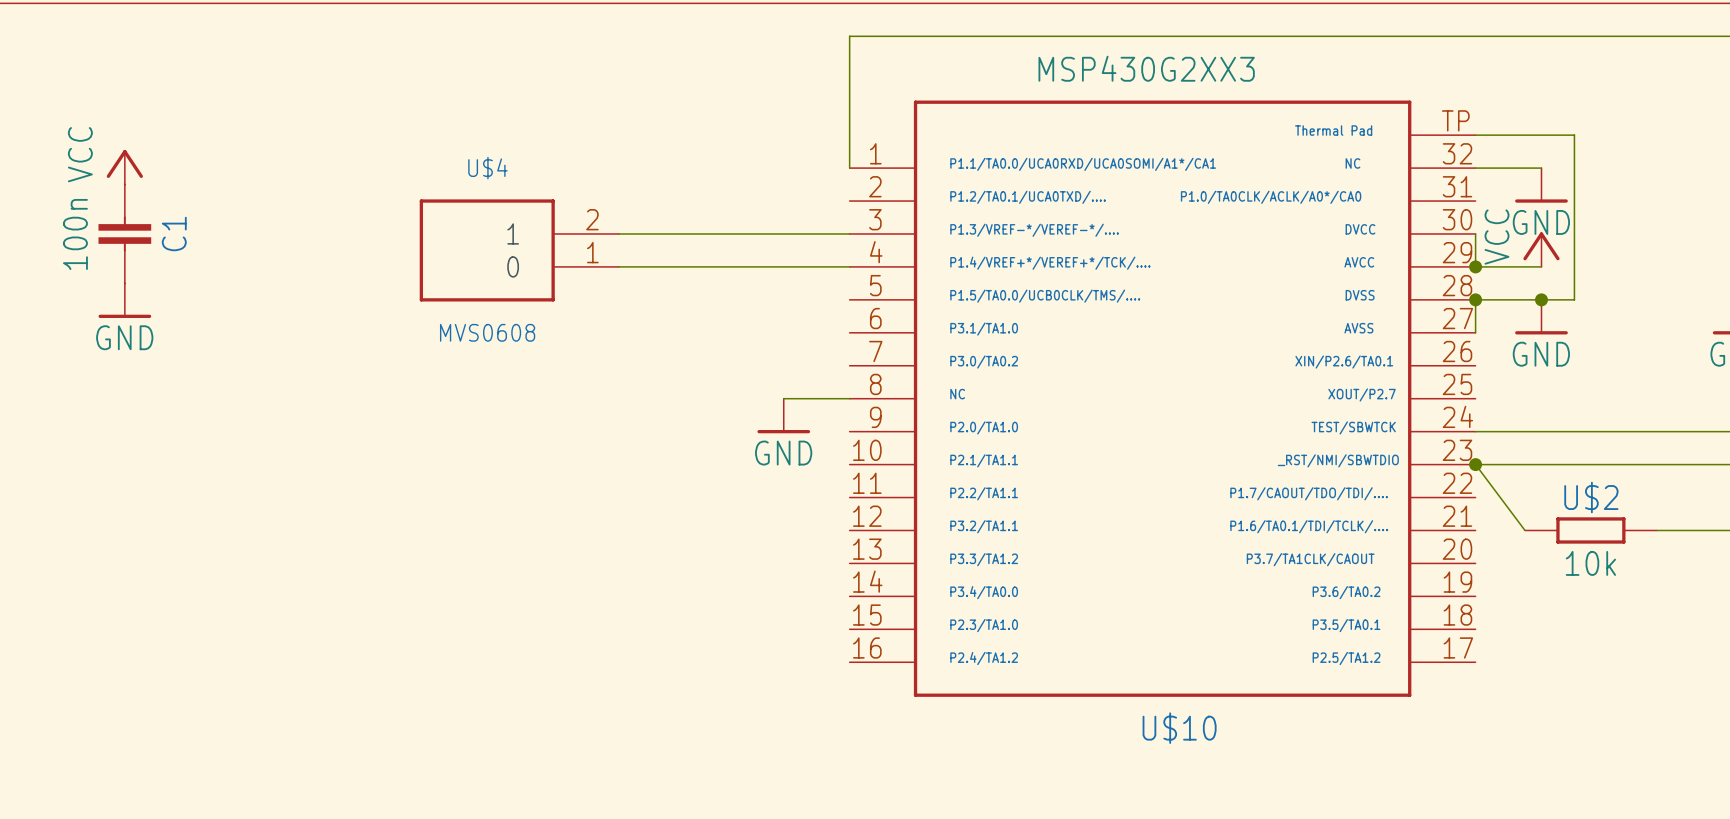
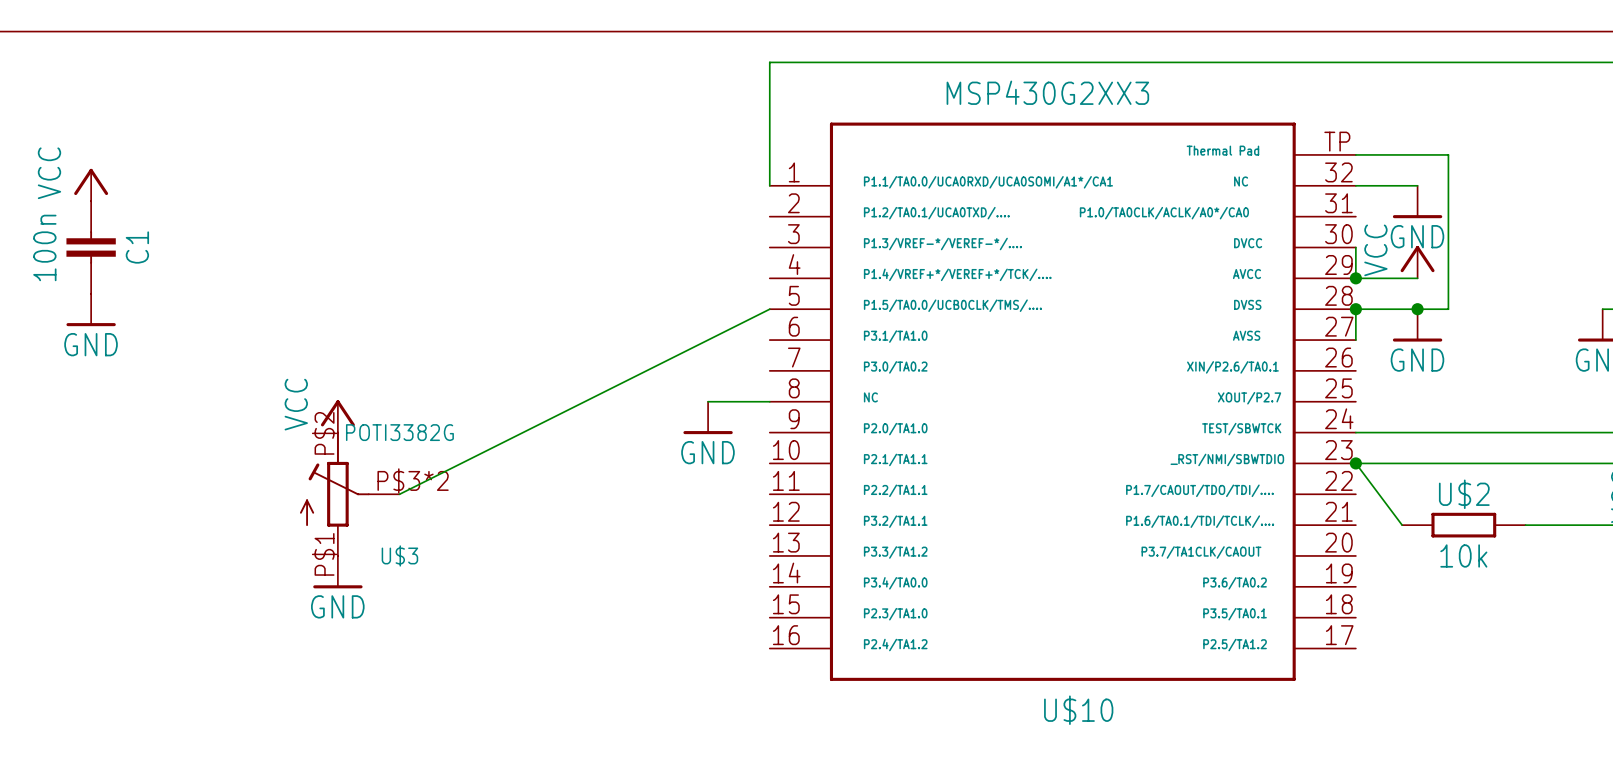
wire: (619, 233) (849, 233) -> none
U$4: MVS0608 (519, 250) -> none
wire: (619, 266) (849, 266) -> none
wire: none -> (769, 309) (399, 494)
power symbol: none -> VCC (337, 416)
U$3: none -> POTI3382G (349, 493)
power symbol: none -> GND (337, 572)

